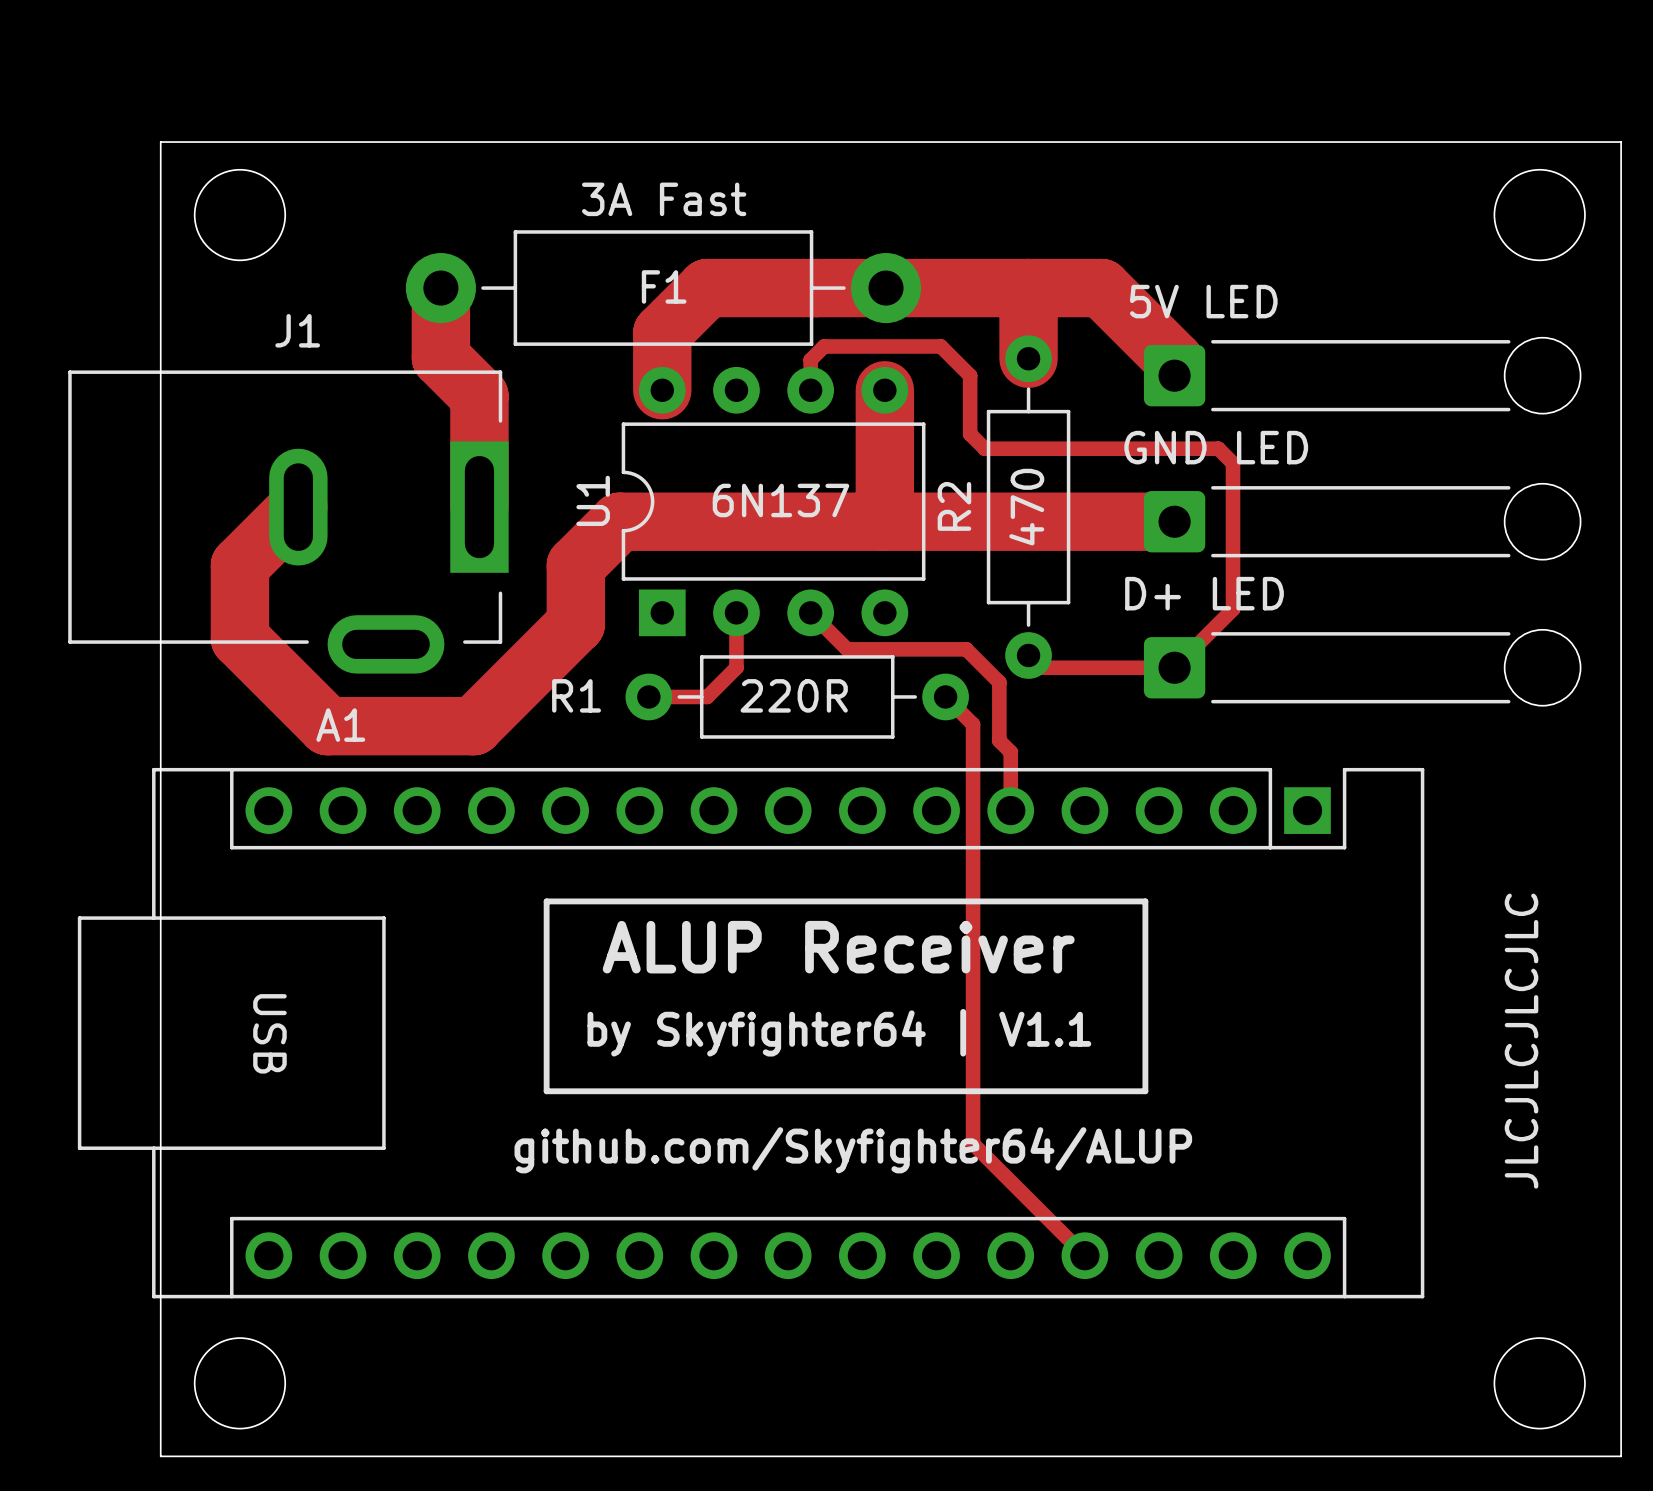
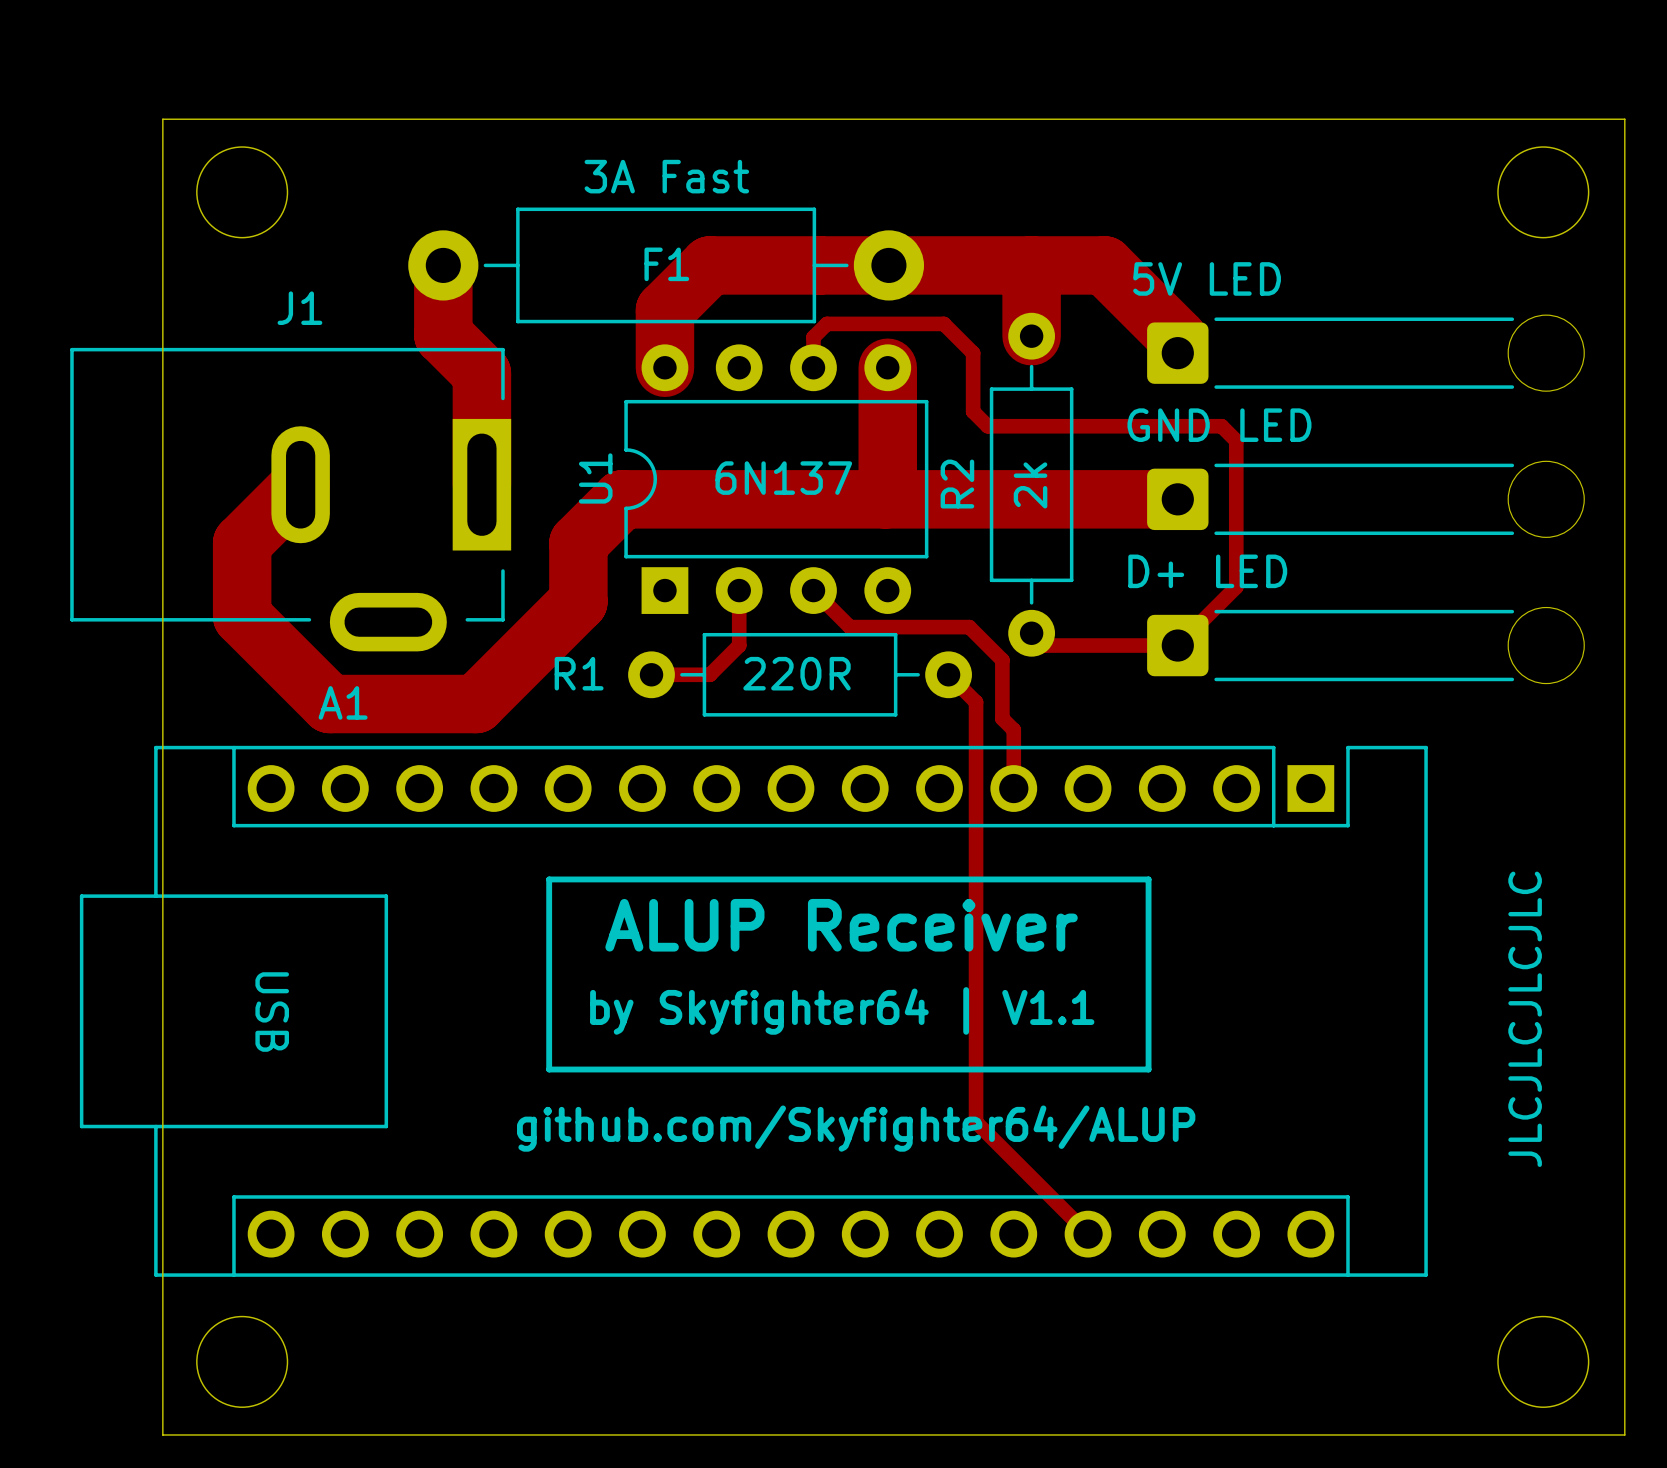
R2 value: 470 (1026, 507) -> 2k (1030, 485)

